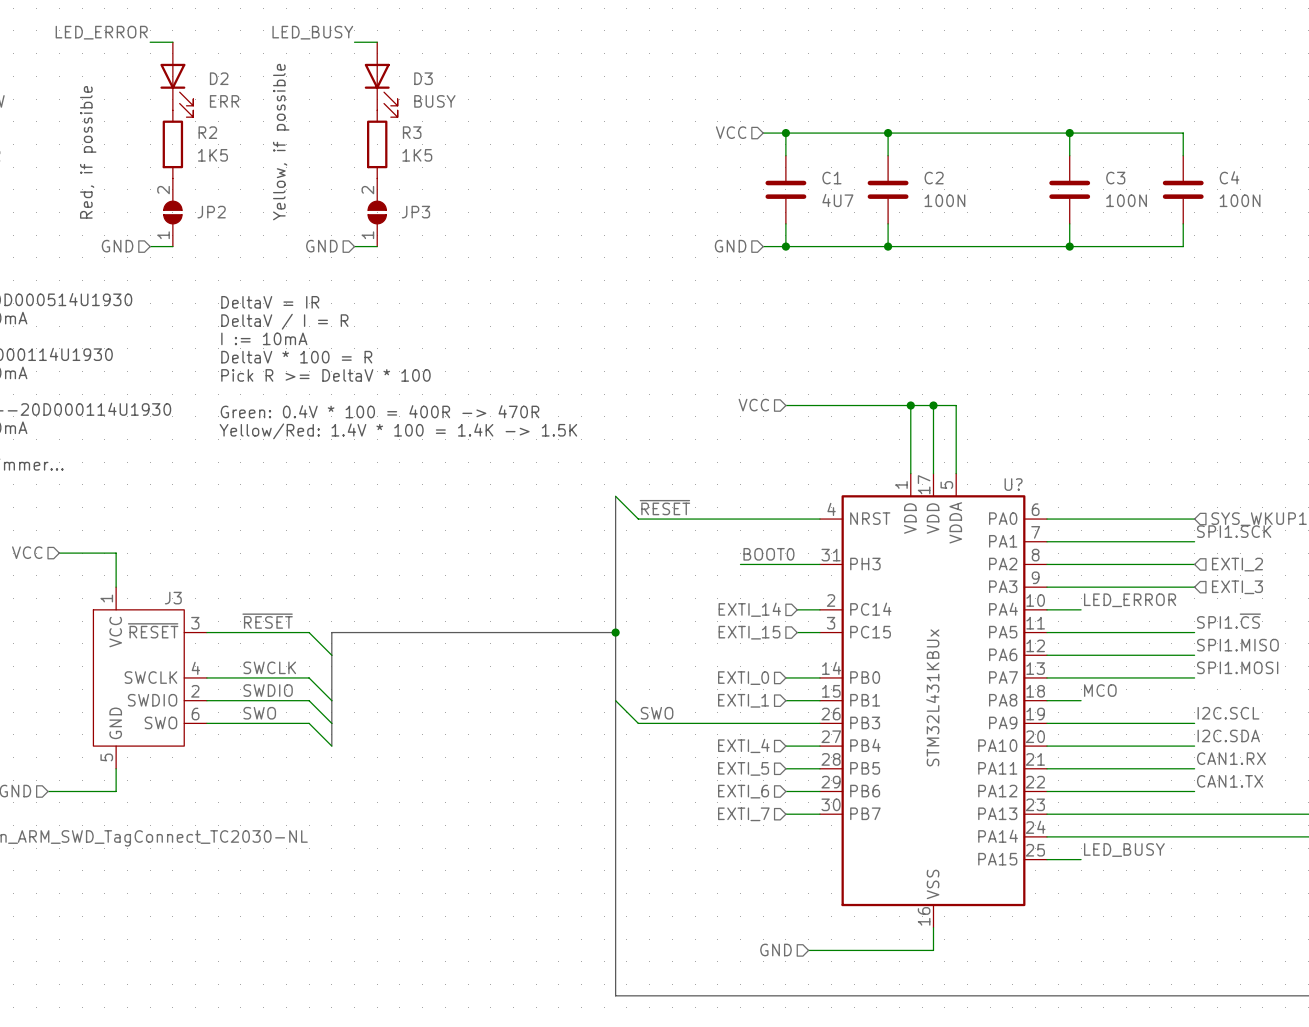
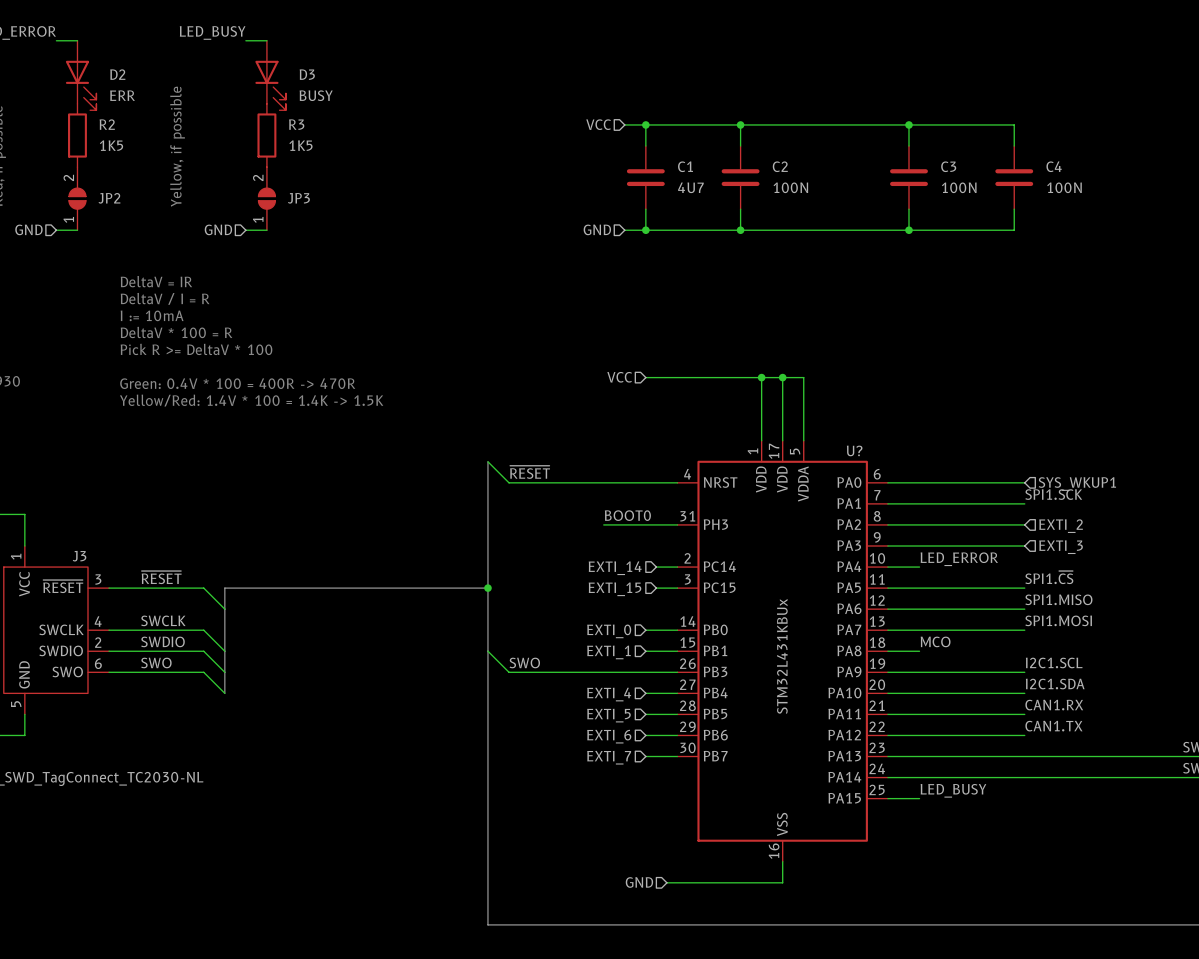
label: I2C.SCL (1228, 713) -> I2C1.SCL (1054, 662)
label: I2C.SDA (1228, 735) -> I2C1.SDA (1055, 684)

